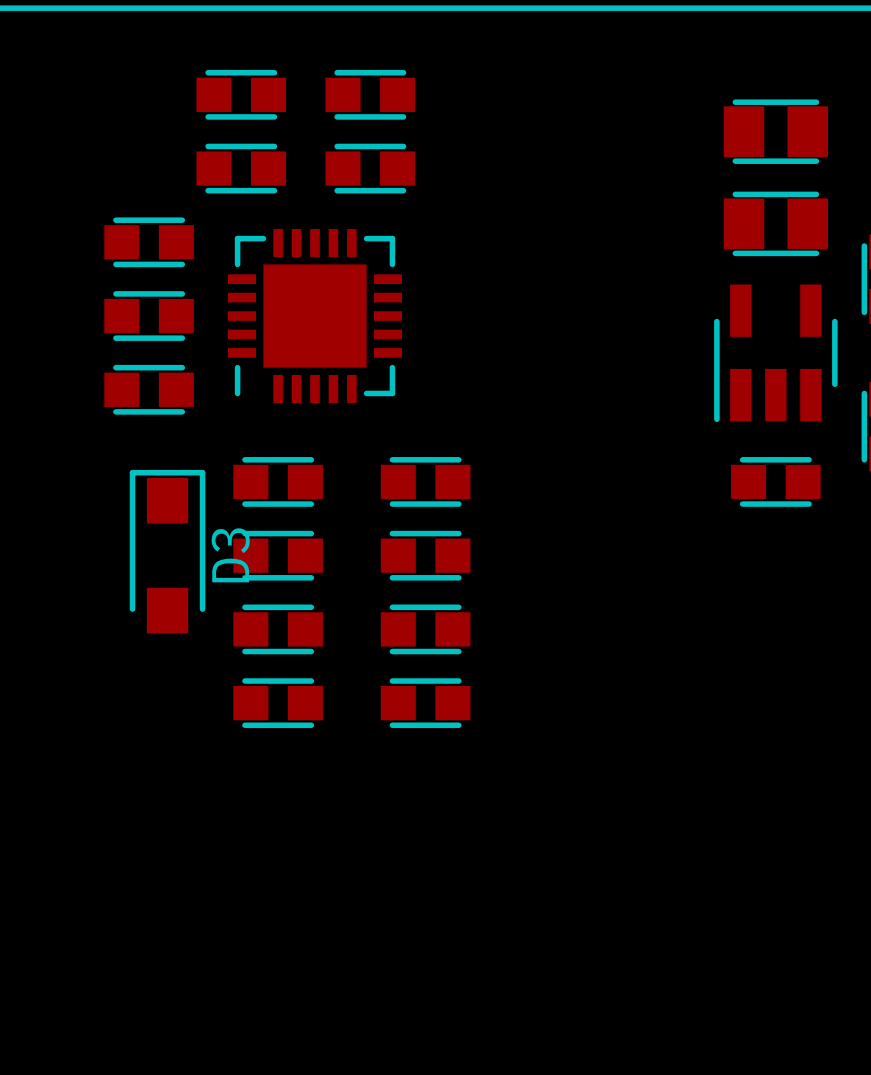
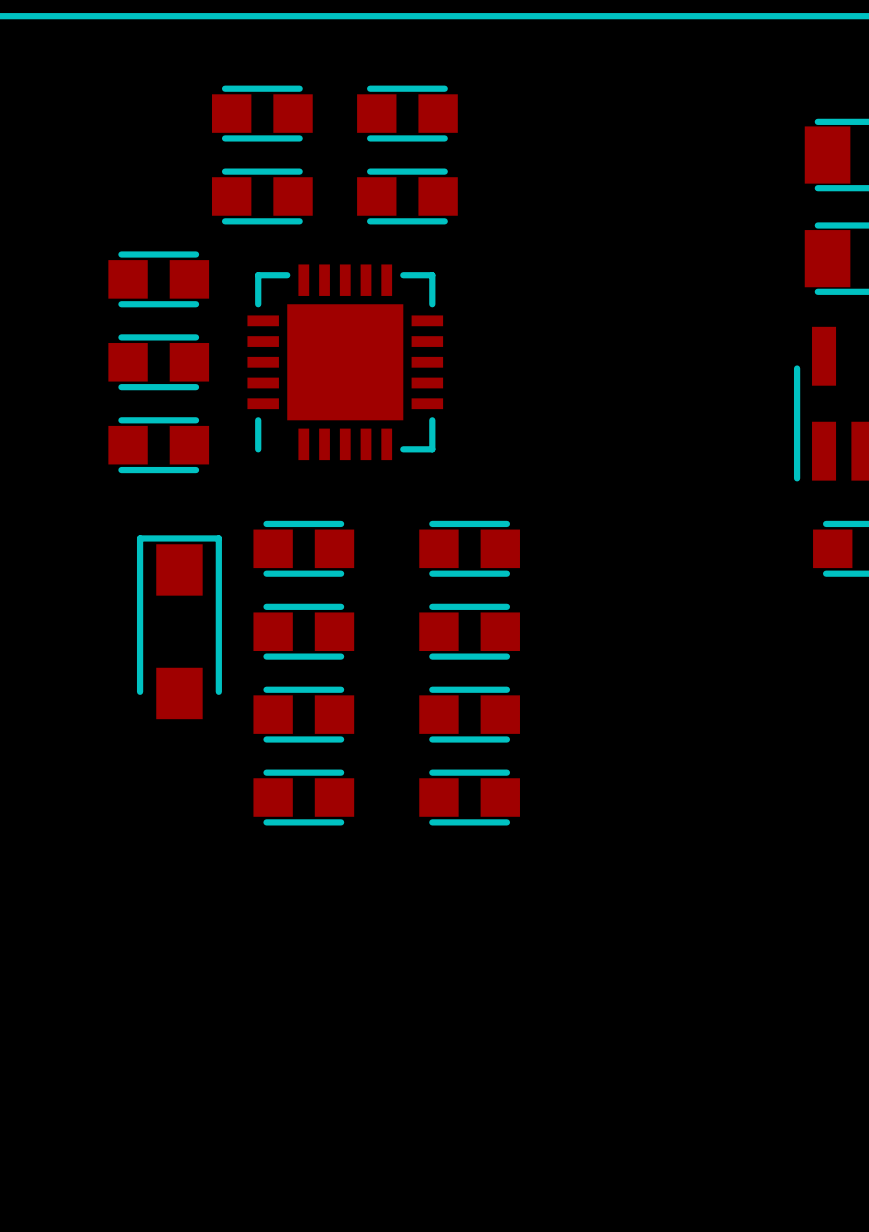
D3 name: D3 (230, 555) -> none

